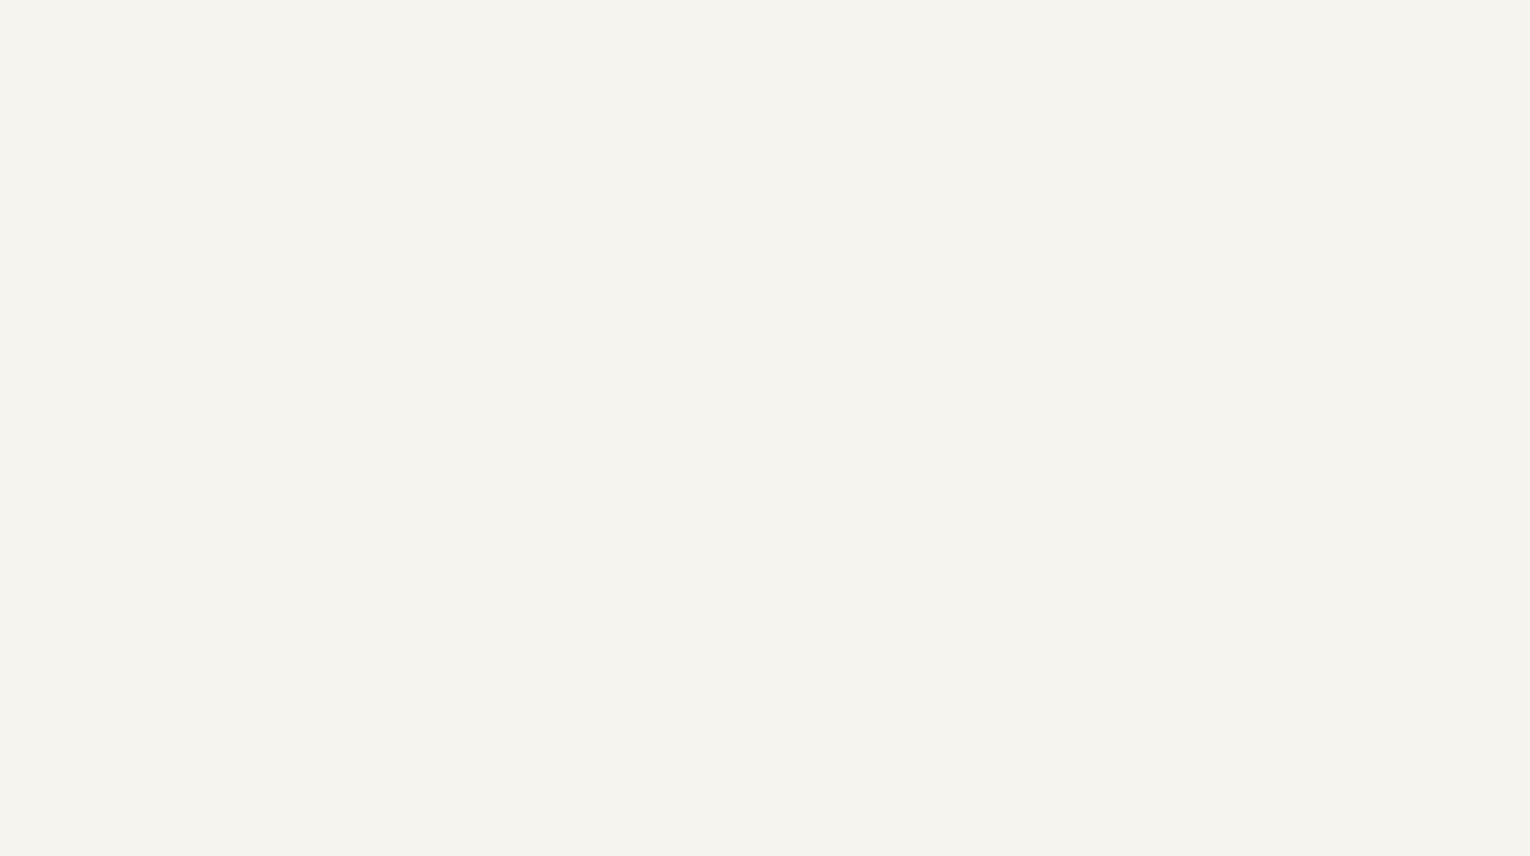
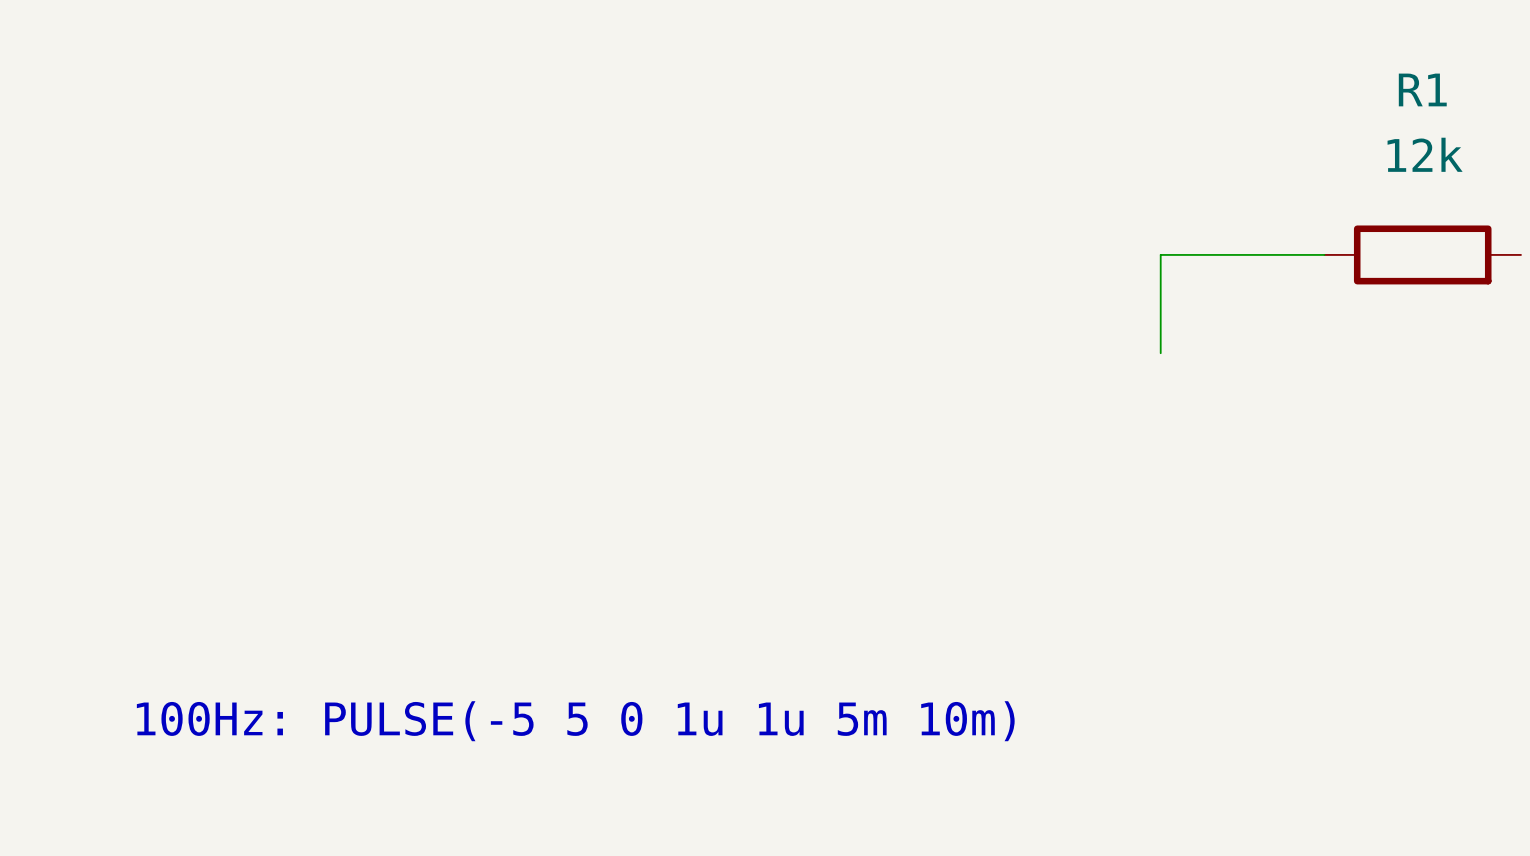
wire: none -> (1324, 254) (1160, 254) (1160, 353)
R1: none -> 12k (1422, 254)
text: none -> 100Hz: PULSE(-5 5 0 1u 1u 5m 10m) (575, 721)

